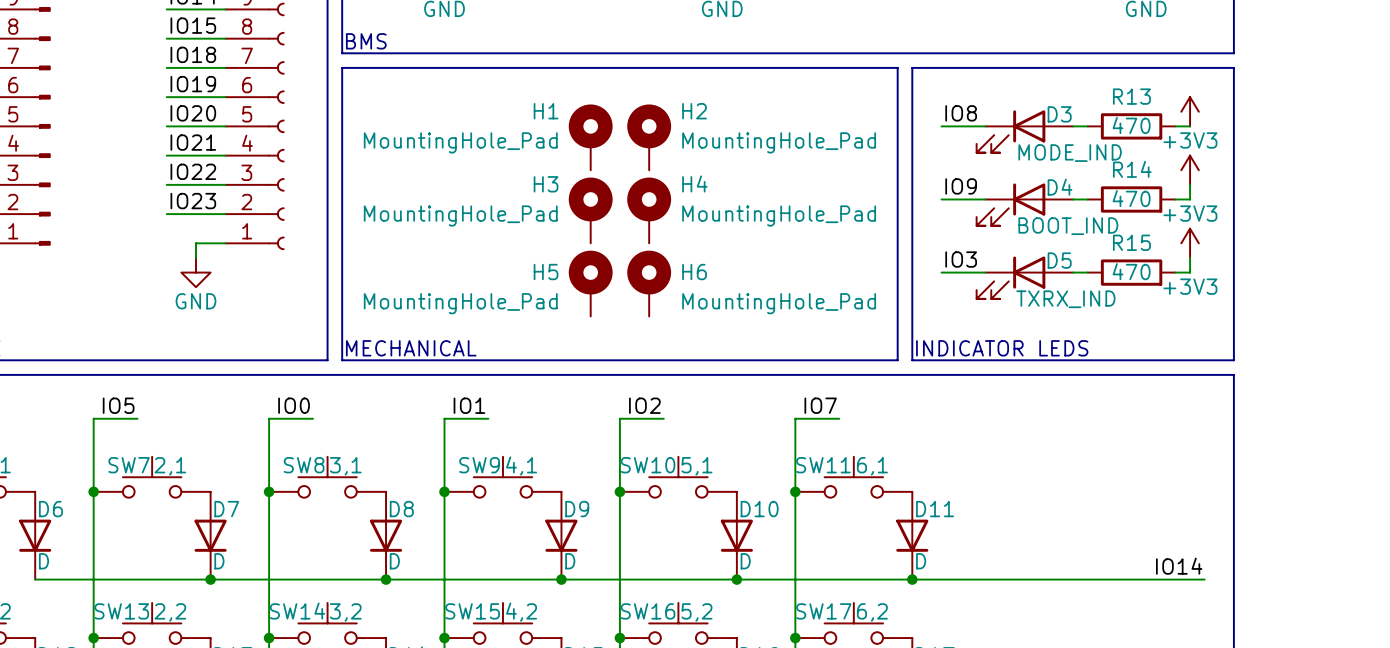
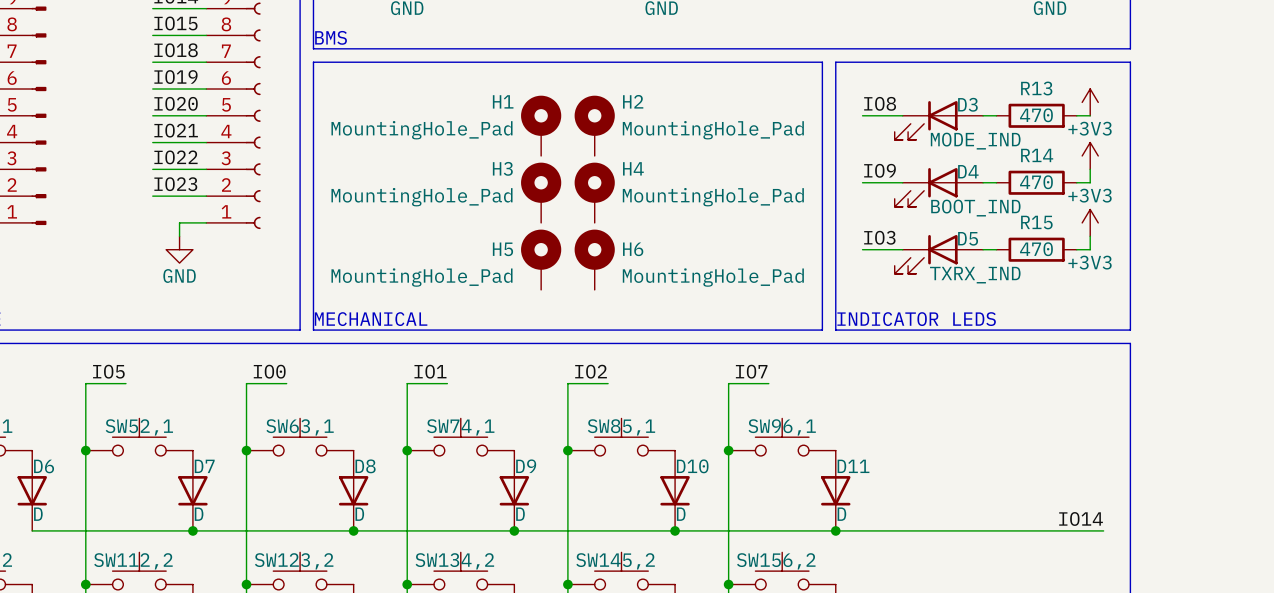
SW7 name: SW7 (129, 465) -> SW5 (121, 426)
SW8 name: SW8 (304, 465) -> SW6 (282, 426)
SW9 name: SW9 (479, 465) -> SW7 (443, 426)
SW10 name: SW10 (648, 465) -> SW8 (604, 426)
SW11 name: SW11 (823, 465) -> SW9 (764, 426)
SW13 name: SW13 (121, 611) -> SW11 (116, 560)
SW14 name: SW14 (297, 611) -> SW12 (276, 560)
SW15 name: SW15 (472, 611) -> SW13 (437, 560)
SW16 name: SW16 (648, 611) -> SW14 (598, 560)
SW17 name: SW17 (823, 611) -> SW15 (758, 560)

